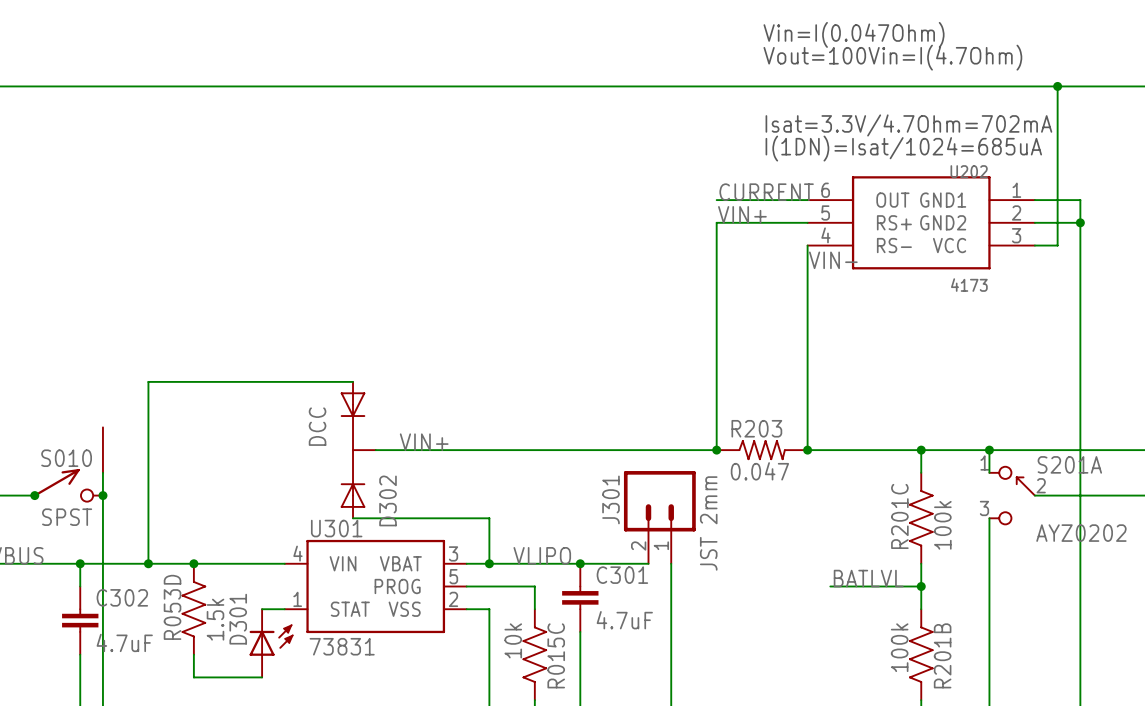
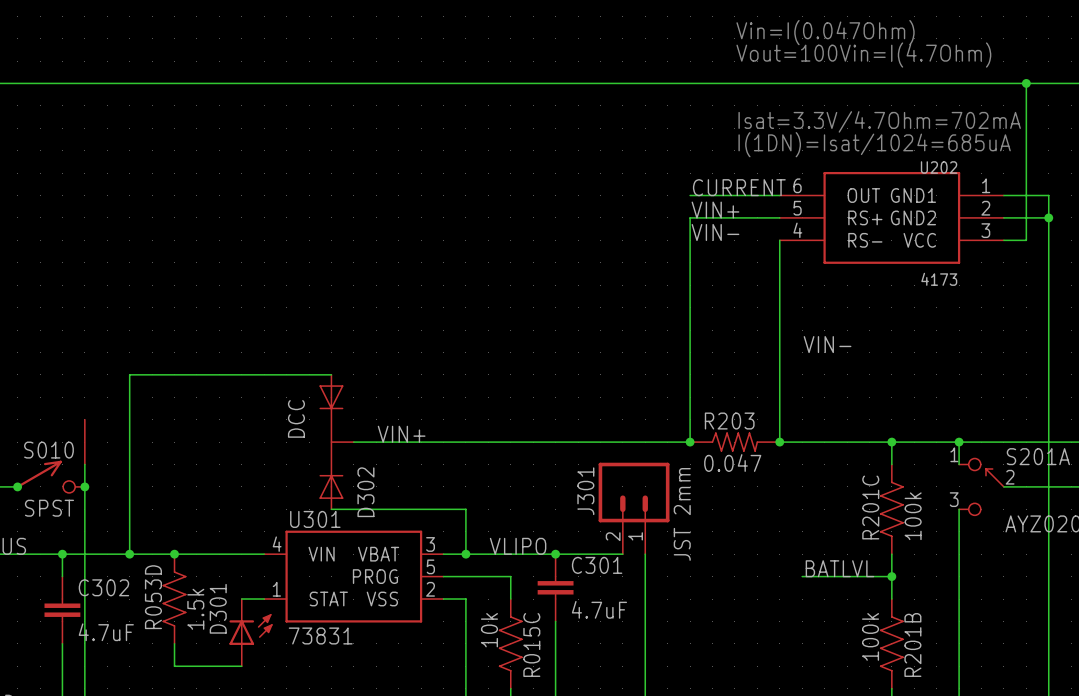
label: none -> VIN- (715, 232)
label: VIN- (833, 260) -> none
label: none -> VIN- (827, 344)

